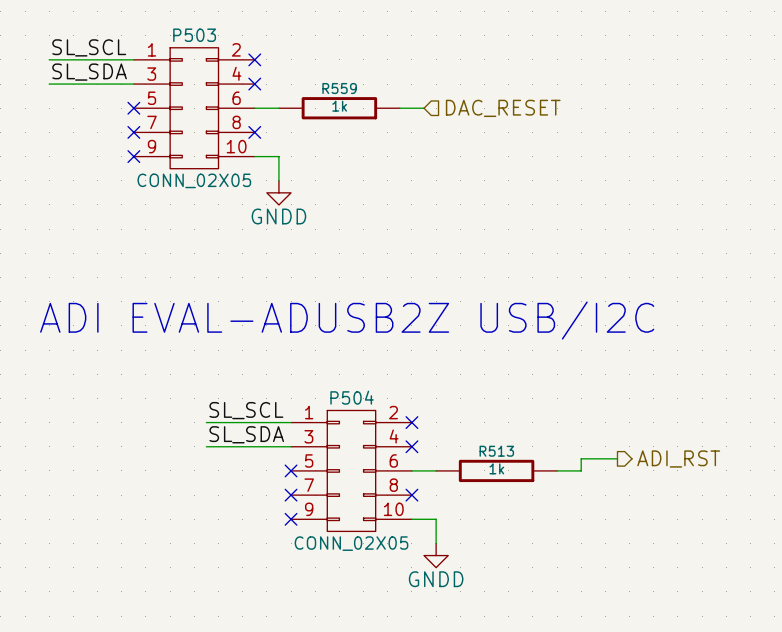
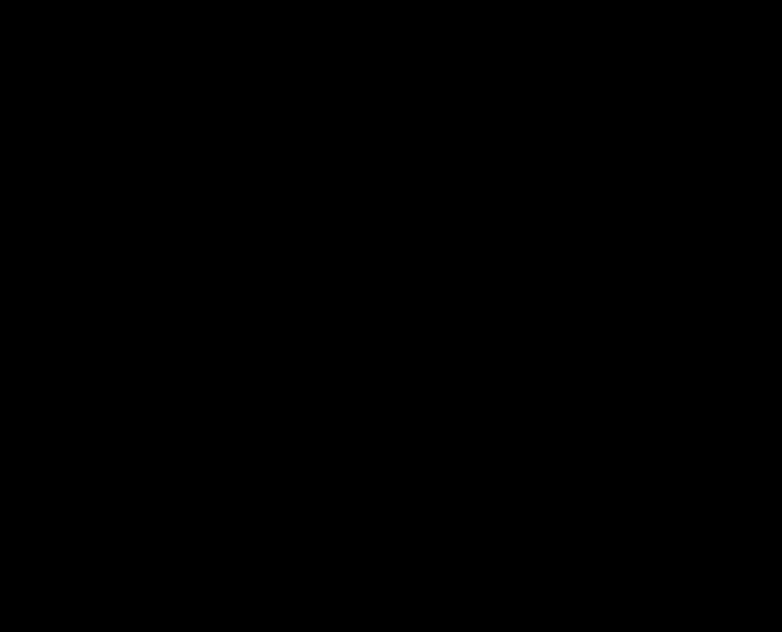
label: SL_SCL (89, 47) -> none
wire: (49, 59) (133, 59) -> none
no-connect mark: (254, 59) -> none
label: SL_SDA (89, 72) -> none
wire: (49, 84) (133, 84) -> none
no-connect mark: (254, 84) -> none
no-connect mark: (133, 108) -> none
P503: CONN_02X05 (194, 108) -> none
wire: (254, 108) (278, 108) -> none
R559: 1k (339, 108) -> none
wire: (399, 108) (424, 108) -> none
hierarchical label: DAC_RESET (503, 108) -> none
no-connect mark: (133, 132) -> none
no-connect mark: (254, 132) -> none
no-connect mark: (133, 156) -> none
wire: (254, 156) (278, 156) (278, 180) -> none
power symbol: GNDD (278, 192) -> none
text: ADI EVAL-ADUSB2Z USB/I2C (347, 320) -> none
label: SL_SCL (246, 410) -> none
wire: (206, 422) (291, 422) -> none
no-connect mark: (411, 422) -> none
label: SL_SDA (246, 434) -> none
wire: (206, 446) (291, 446) -> none
no-connect mark: (411, 446) -> none
wire: (617, 458) (581, 458) (581, 470) (557, 470) -> none
hierarchical label: ADI_RST (678, 458) -> none
no-connect mark: (291, 470) -> none
P504: CONN_02X05 (351, 470) -> none
wire: (411, 470) (436, 470) -> none
R513: 1k (496, 470) -> none
no-connect mark: (291, 495) -> none
no-connect mark: (411, 495) -> none
no-connect mark: (291, 519) -> none
wire: (411, 519) (436, 519) (436, 543) -> none
power symbol: GNDD (436, 555) -> none

